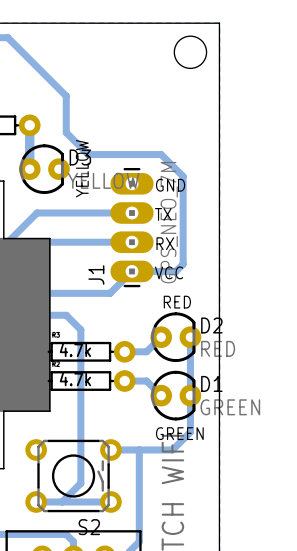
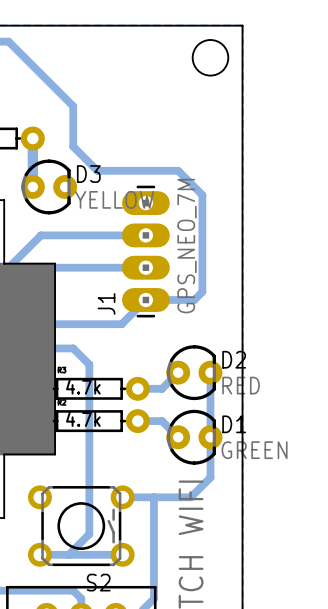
text: YELLOW (82, 168) -> none
text: GND (170, 185) -> none
text: TX (163, 214) -> none
text: RX (165, 243) -> none
text: VCC (169, 272) -> none
text: RED (177, 302) -> none
text: GREEN (179, 433) -> none

